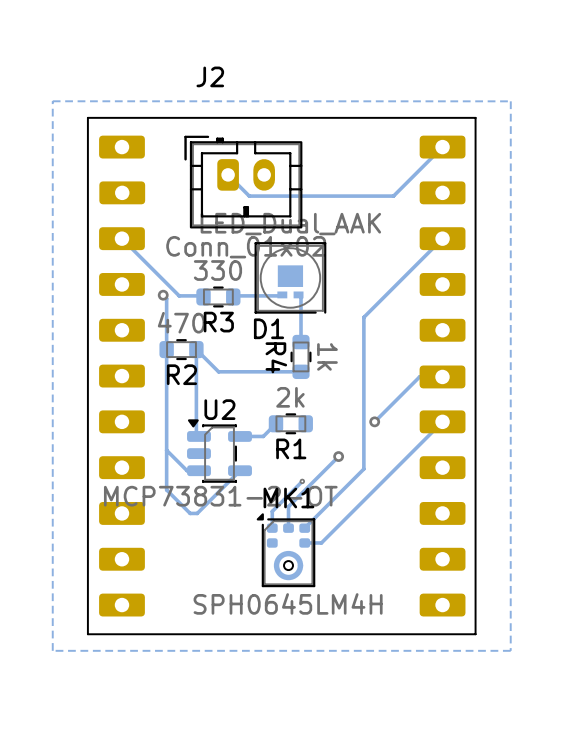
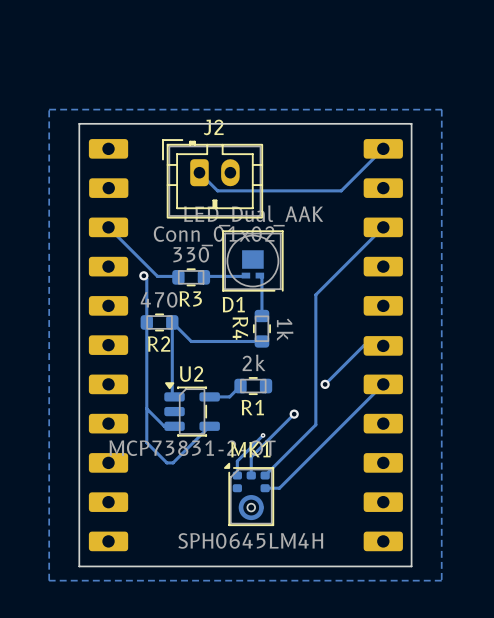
J2 name position: J2 (210, 76) -> J2 (213, 127)

